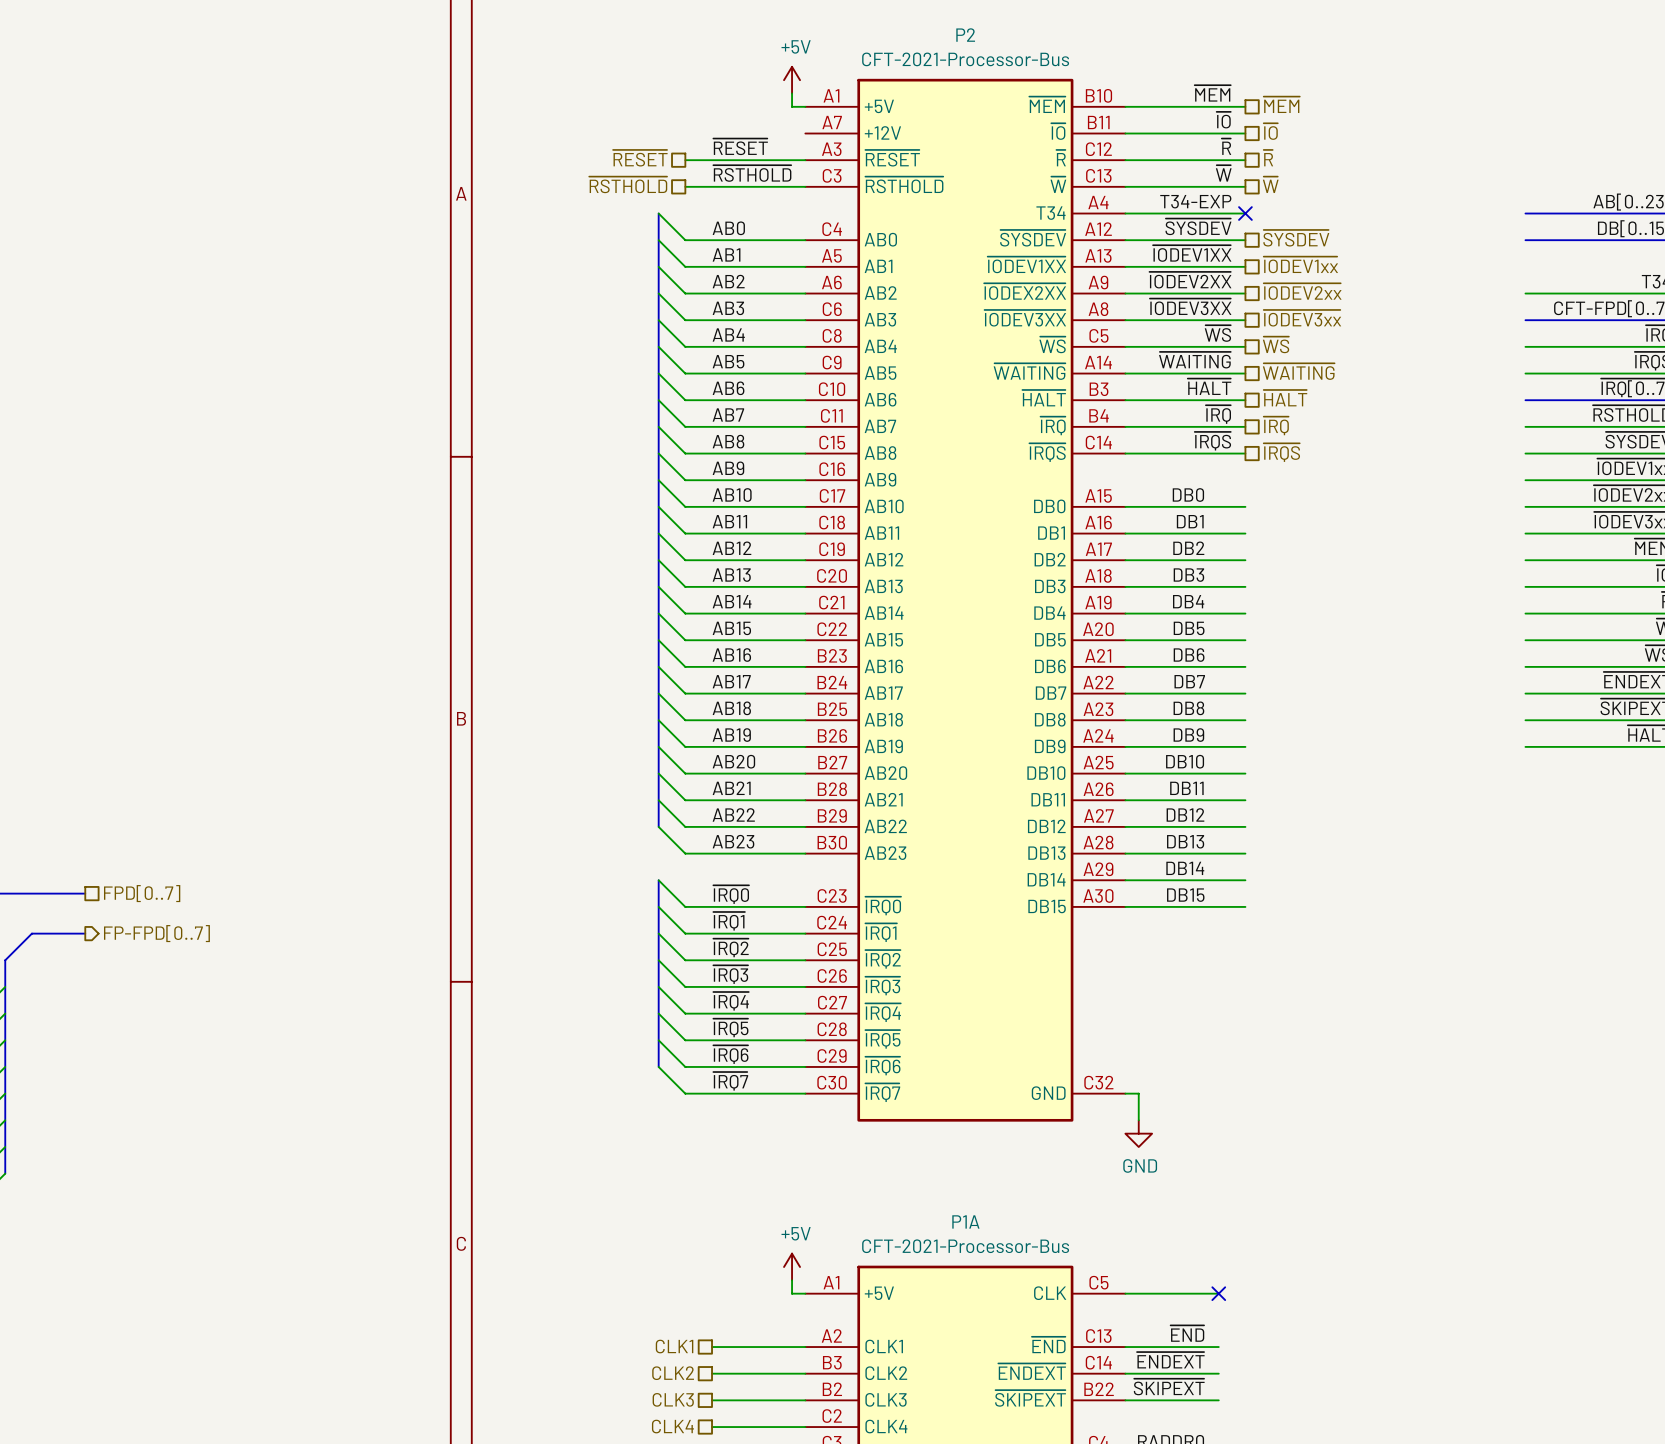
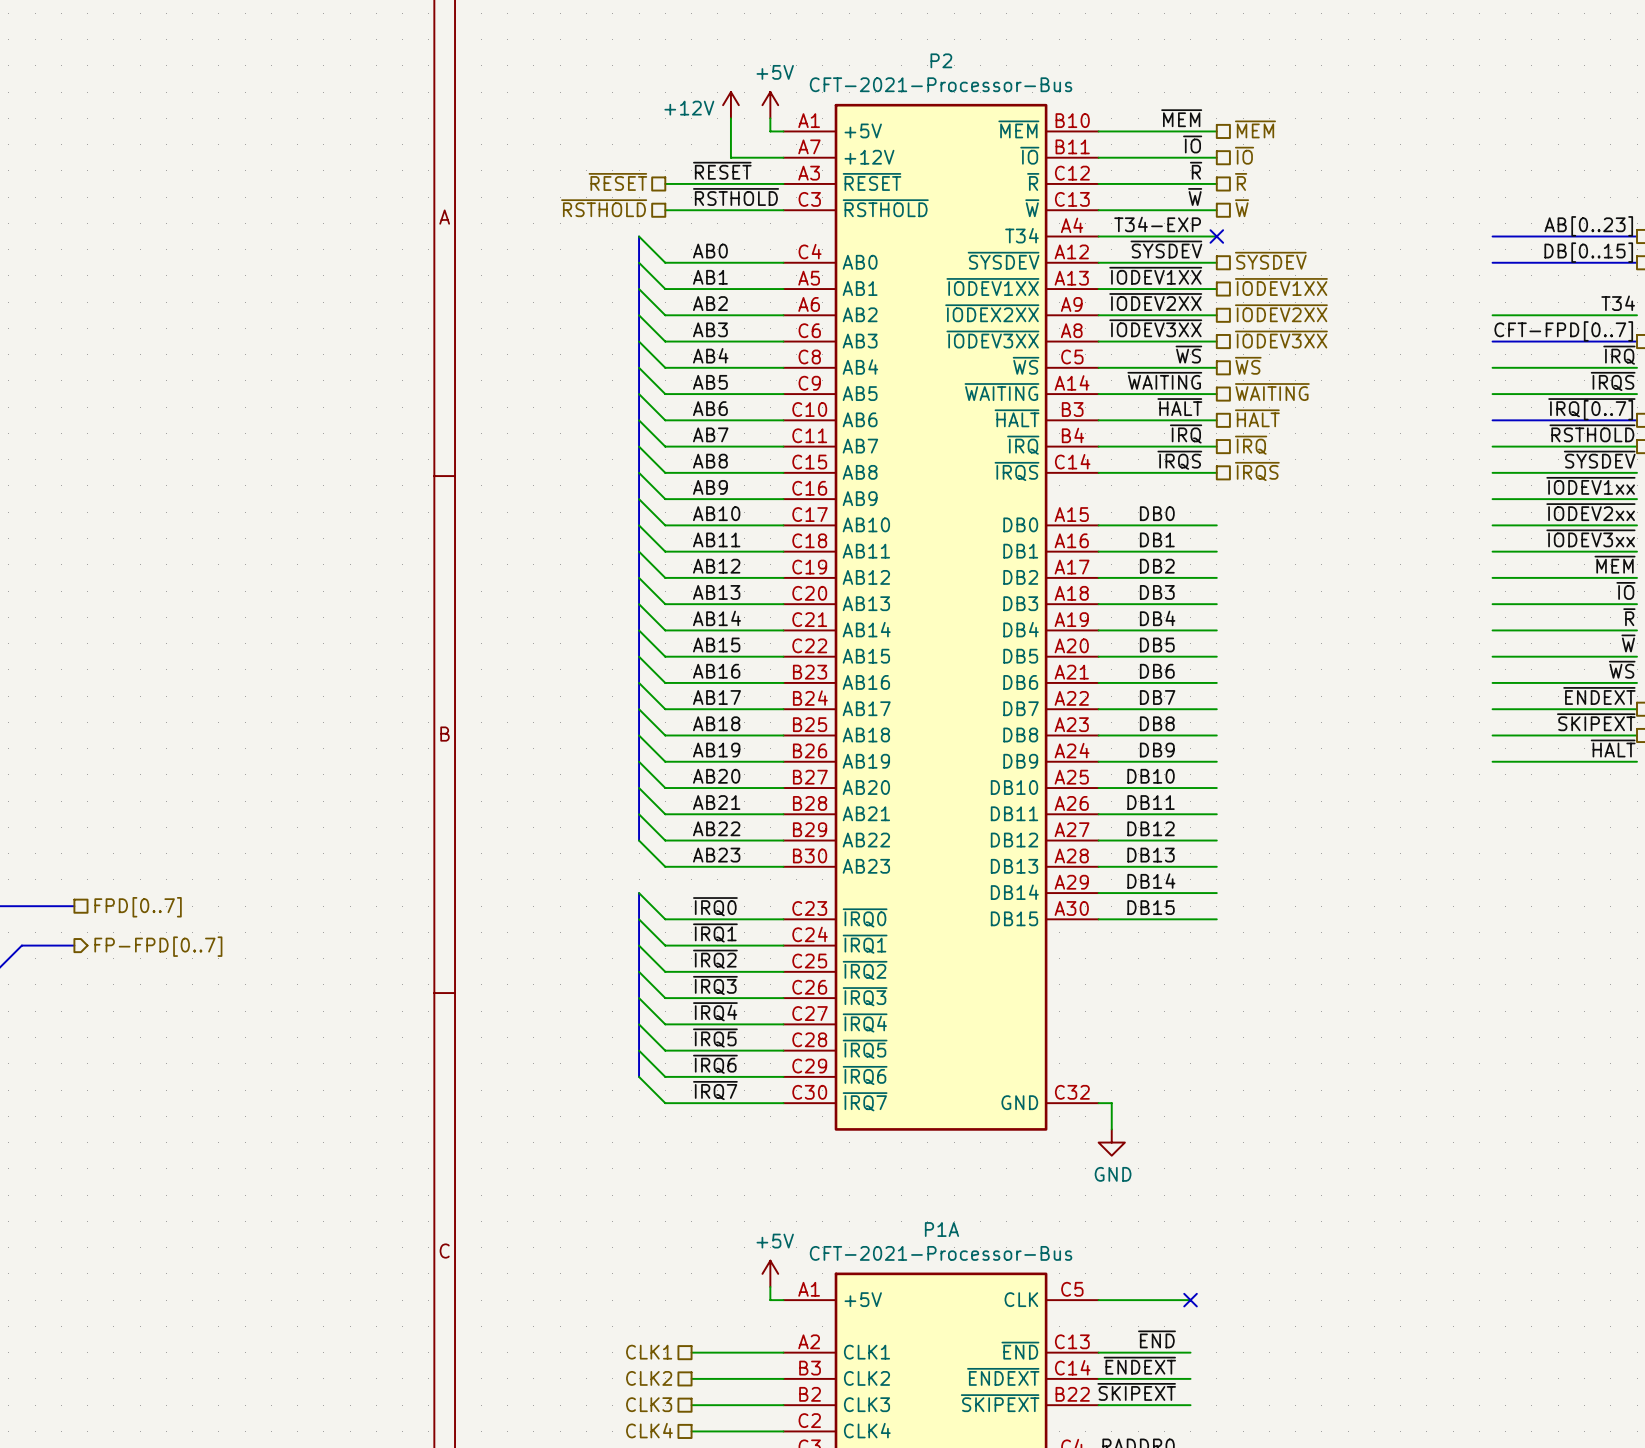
power symbol: none -> +12V (730, 105)
wire: none -> (730, 118) (730, 157) (783, 157)
hierarchical label: ~{IODEV1xx} (1300, 264) -> ~{IODEV1XX} (1281, 287)
hierarchical label: ~{IODEV2xx} (1302, 291) -> ~{IODEV2XX} (1281, 313)
hierarchical label: ~{IODEV3xx} (1302, 318) -> ~{IODEV3XX} (1281, 339)

